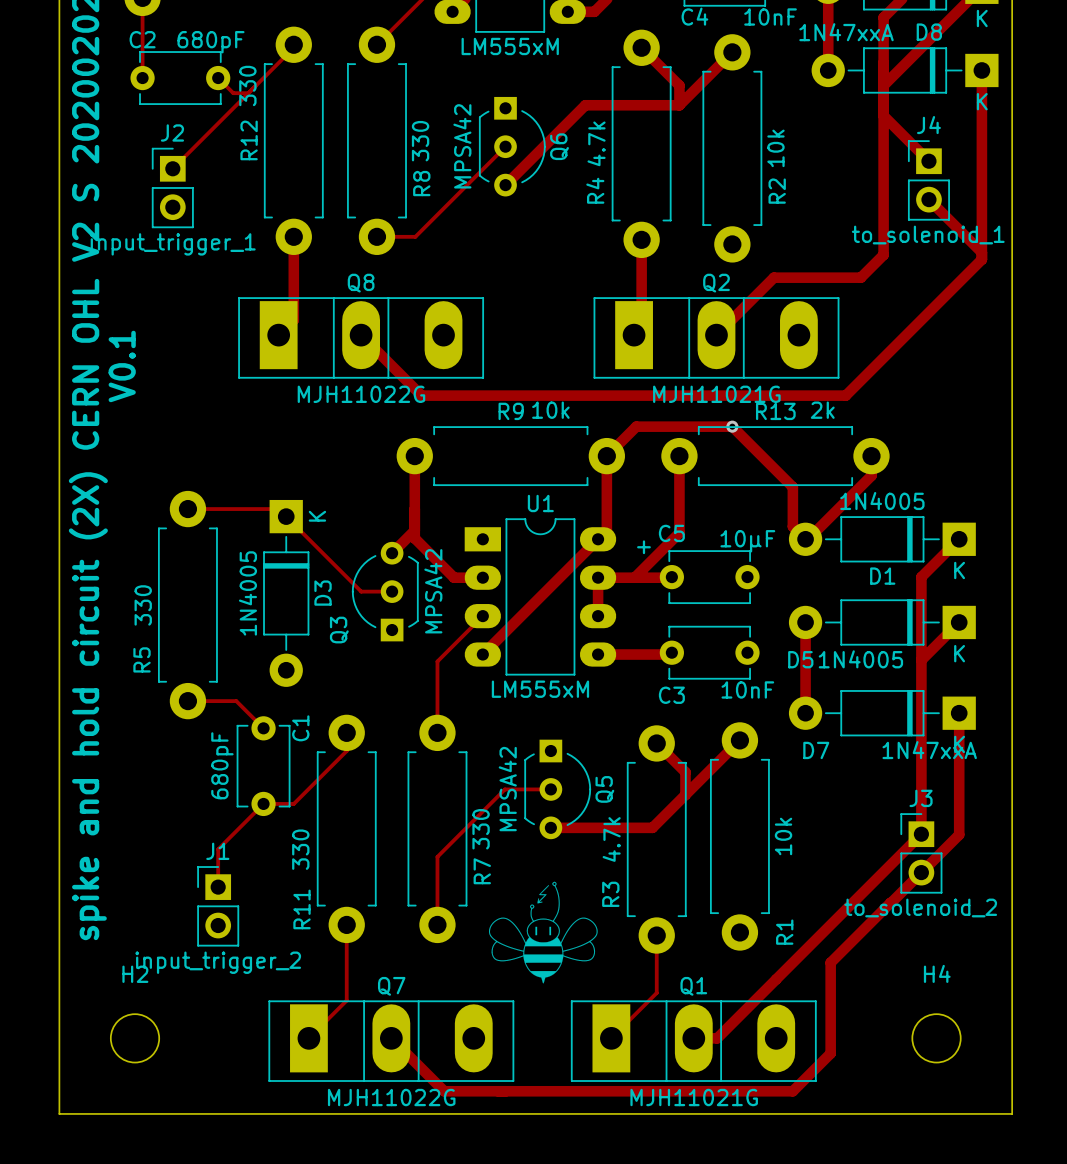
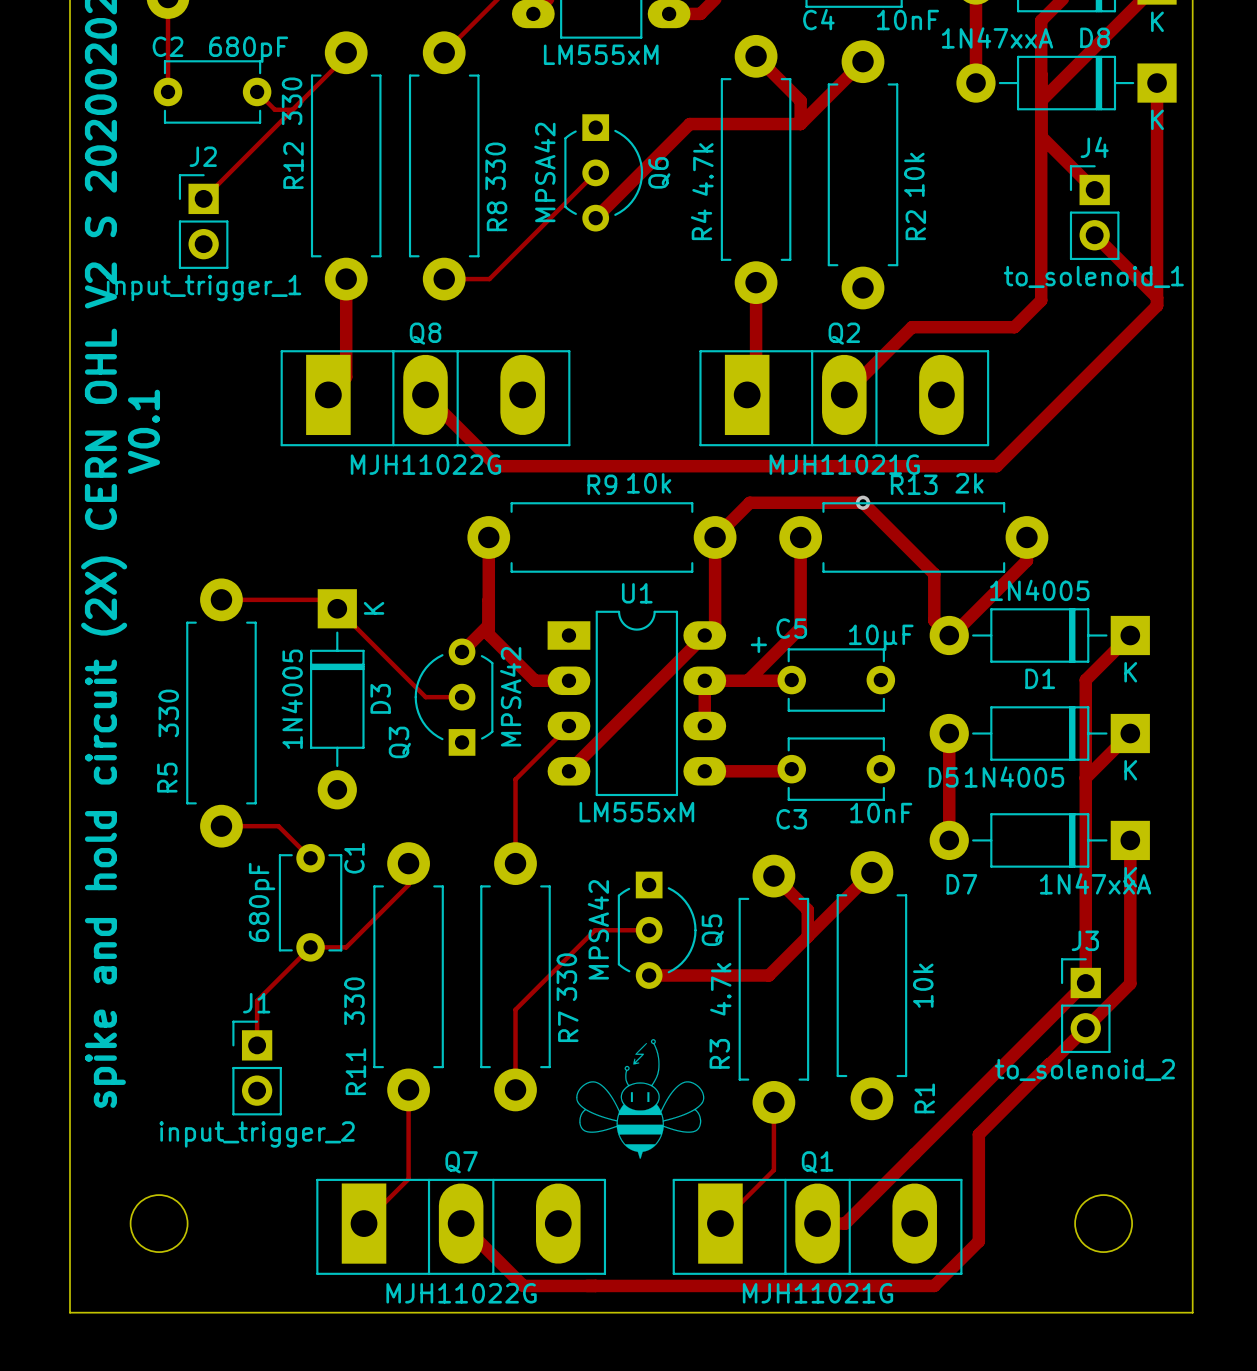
H4 name: H4 (937, 973) -> none
H2 name: H2 (135, 974) -> none

